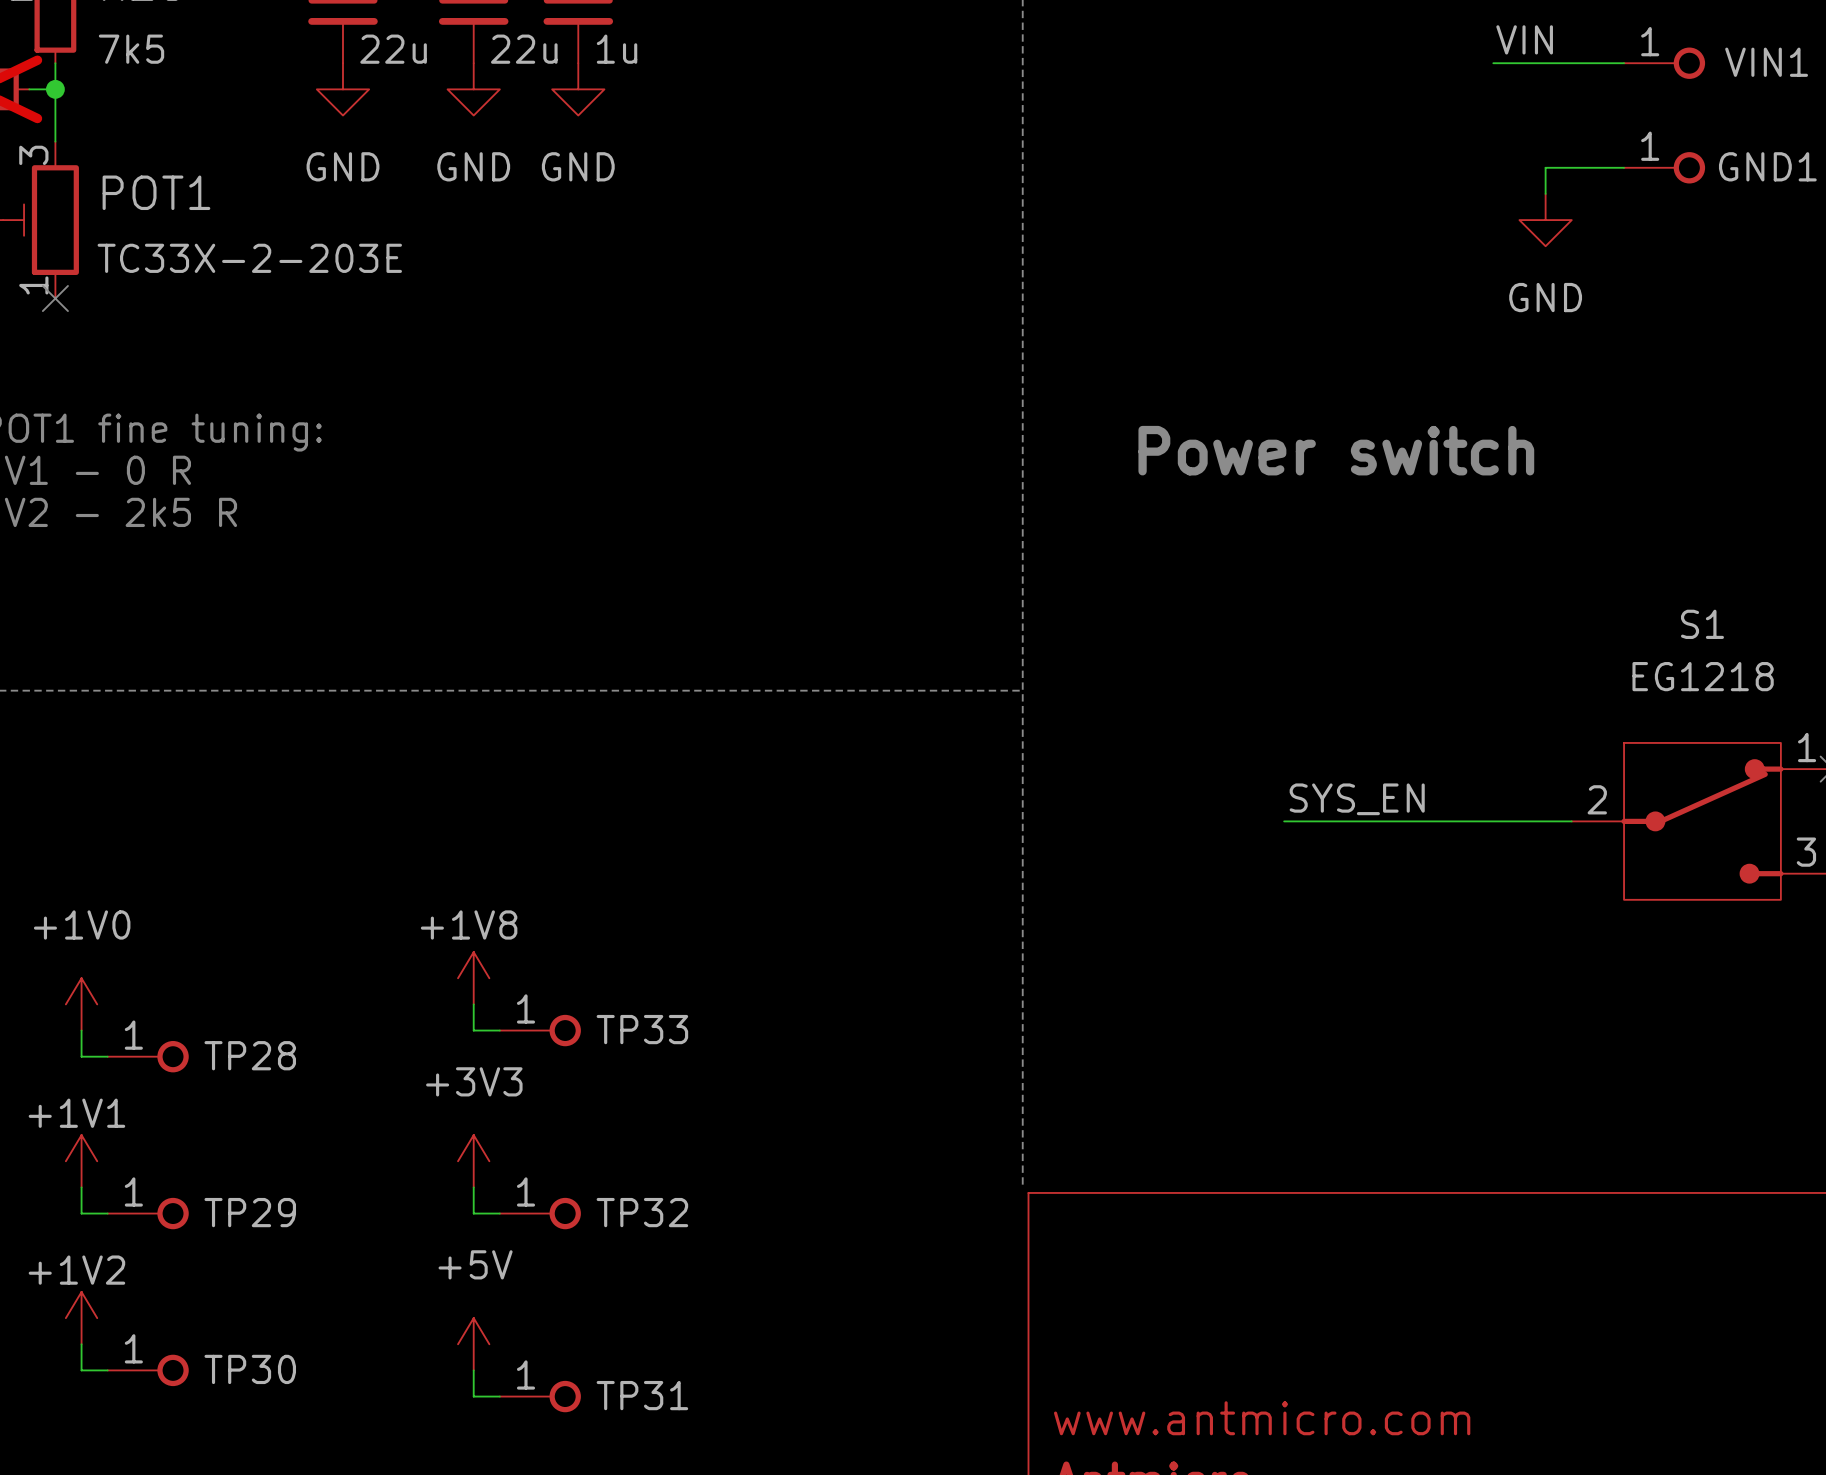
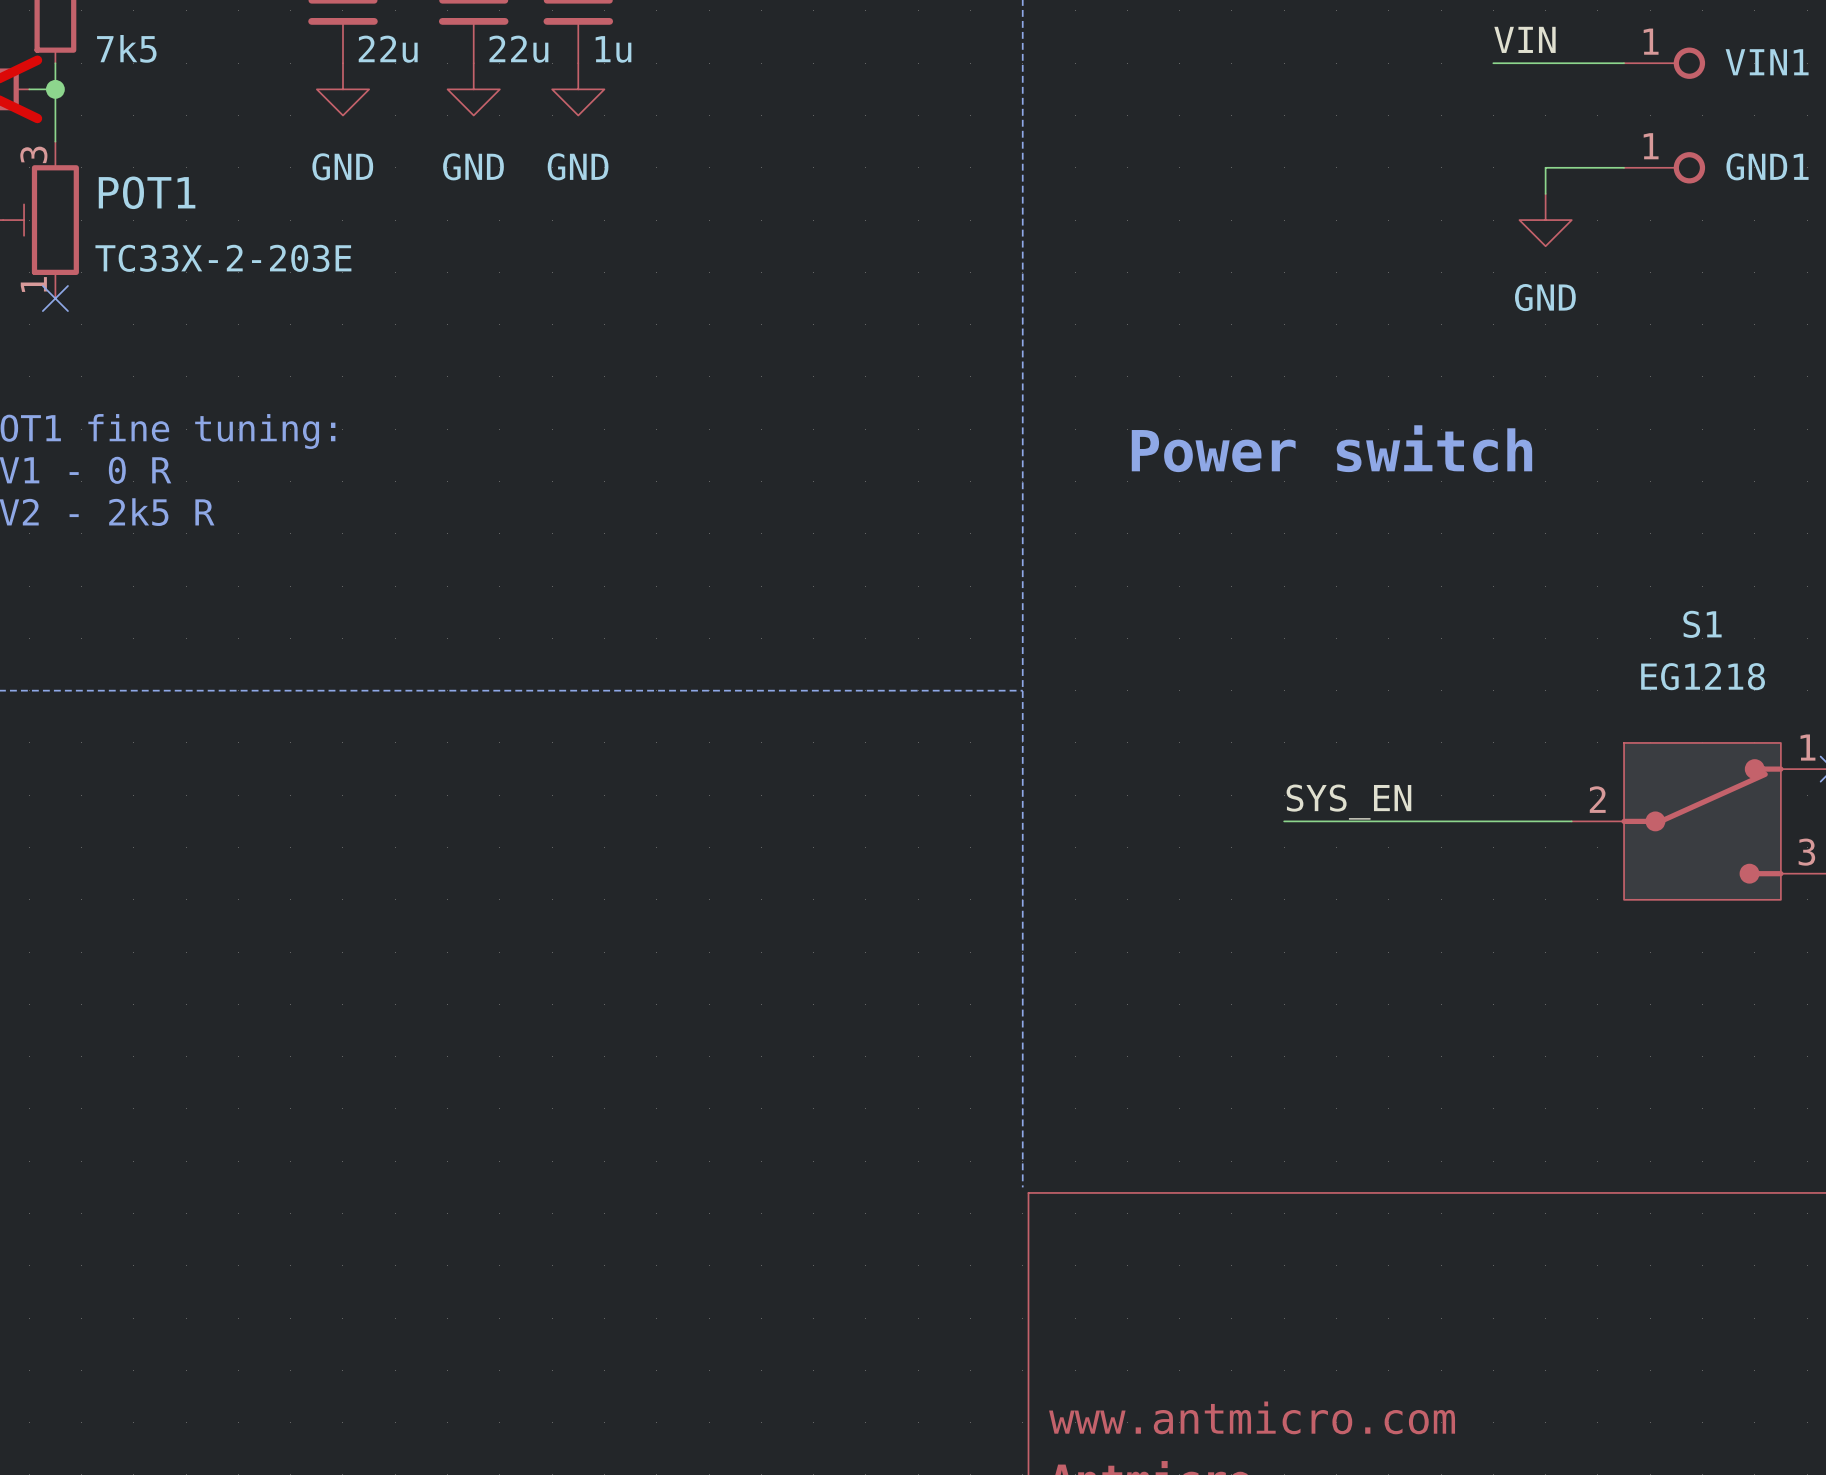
power symbol: +1V8 (473, 978) -> none
power symbol: +1V0 (81, 1004) -> none
wire: (473, 1004) (473, 1030) (499, 1030) -> none
wire: (81, 1030) (81, 1056) (107, 1056) -> none
TP33: (540, 1030) -> none
TP28: (148, 1056) -> none
power symbol: +1V1 (81, 1161) -> none
power symbol: +3V3 (473, 1161) -> none
wire: (81, 1187) (81, 1213) (107, 1213) -> none
wire: (473, 1187) (473, 1213) (499, 1213) -> none
TP29: (148, 1213) -> none
TP32: (540, 1213) -> none
power symbol: +1V2 (81, 1318) -> none
wire: (81, 1344) (81, 1370) (107, 1370) -> none
power symbol: +5V (473, 1344) -> none
TP30: (148, 1370) -> none
wire: (473, 1370) (473, 1396) (499, 1396) -> none
TP31: (540, 1396) -> none

